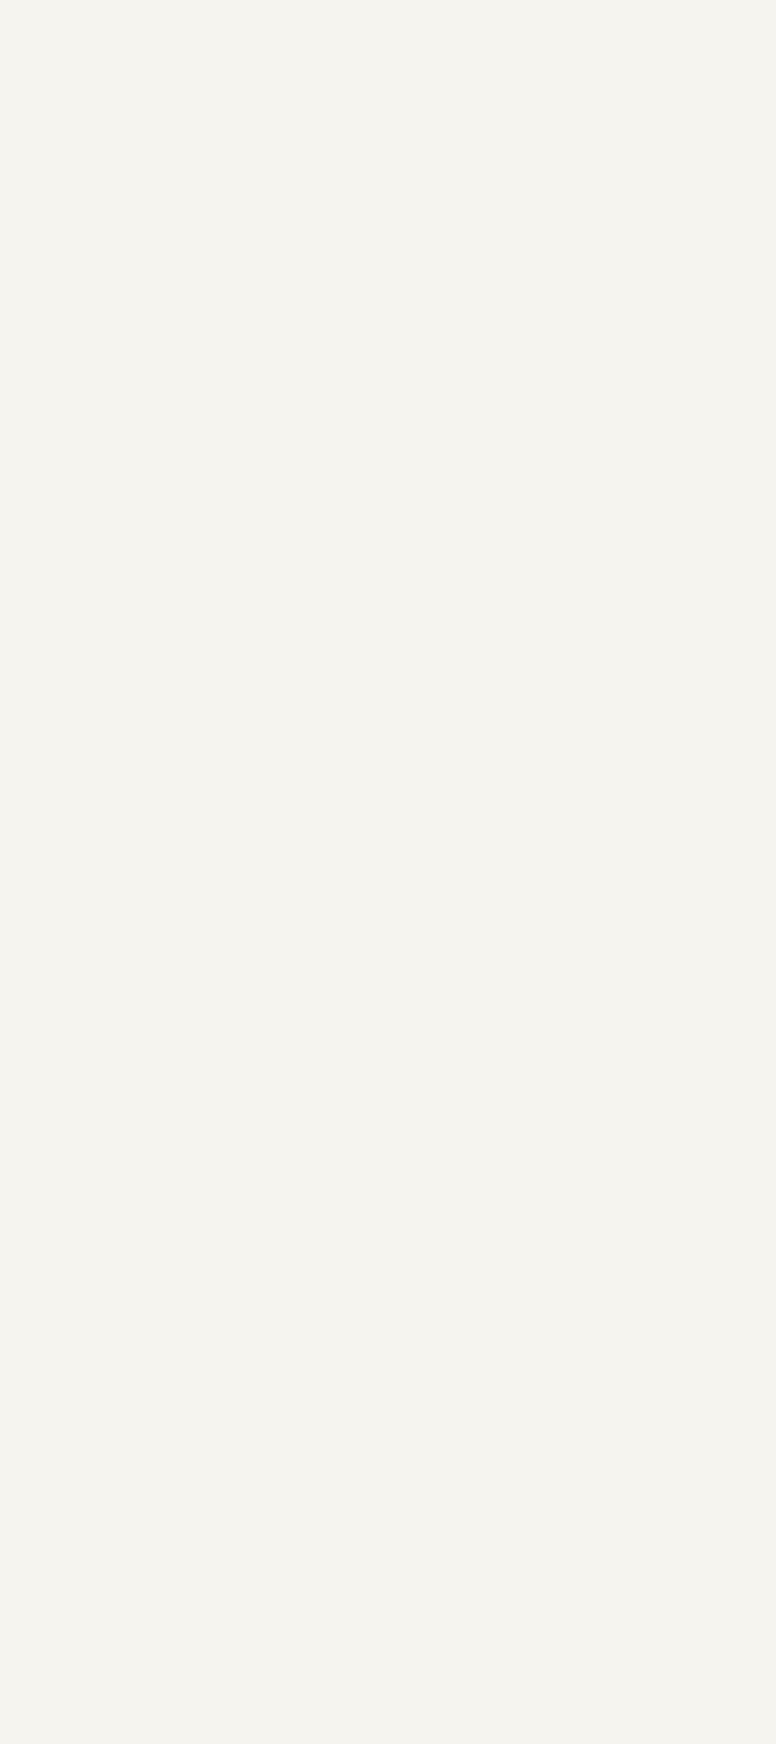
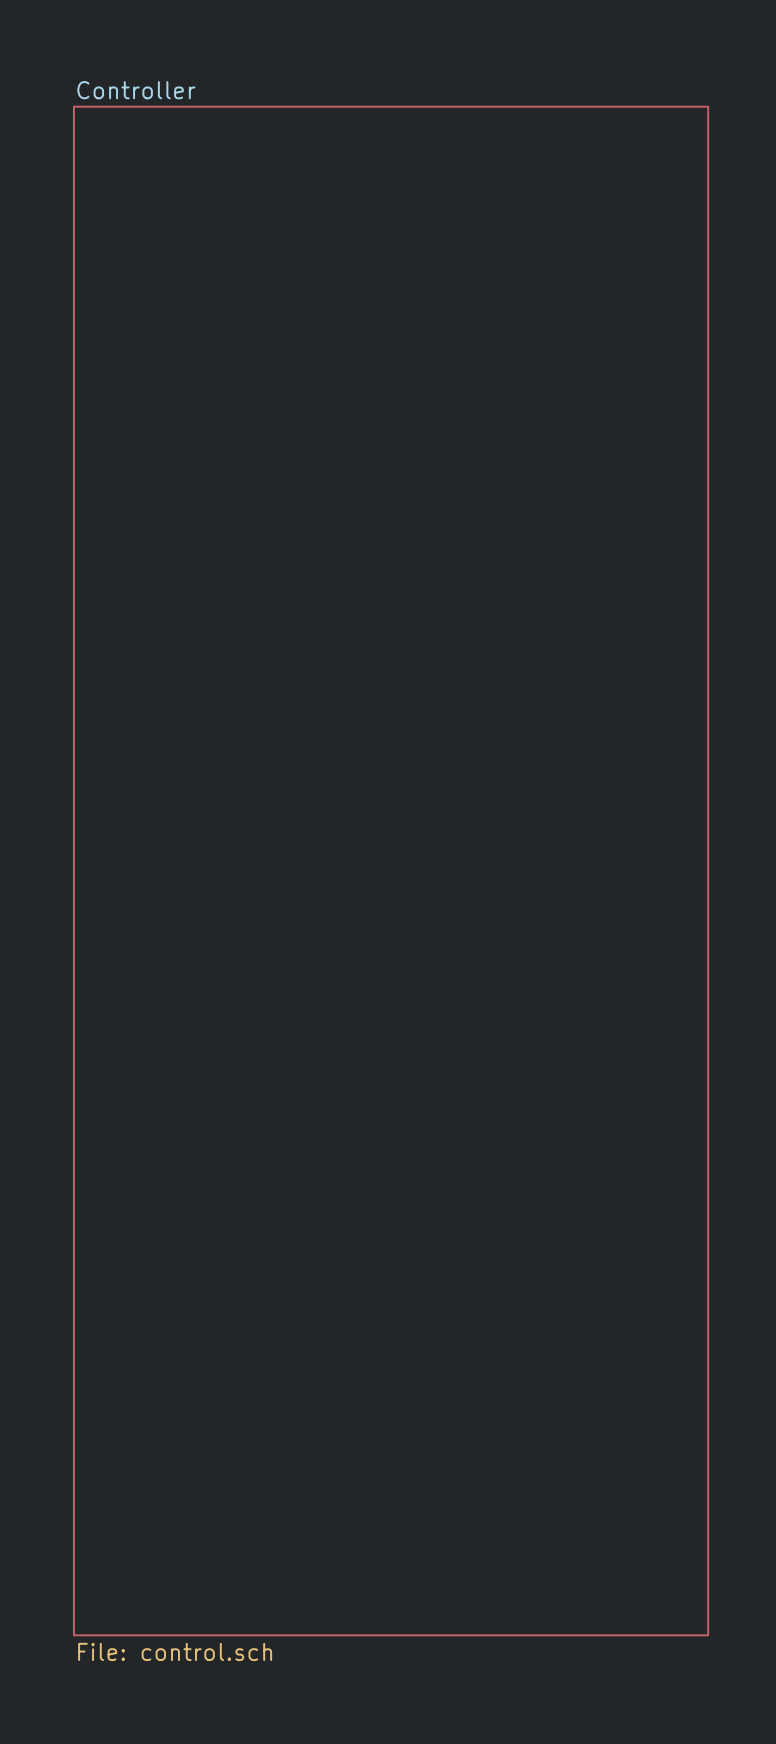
sheet Controller: none -> File: control.sch (391, 871)

